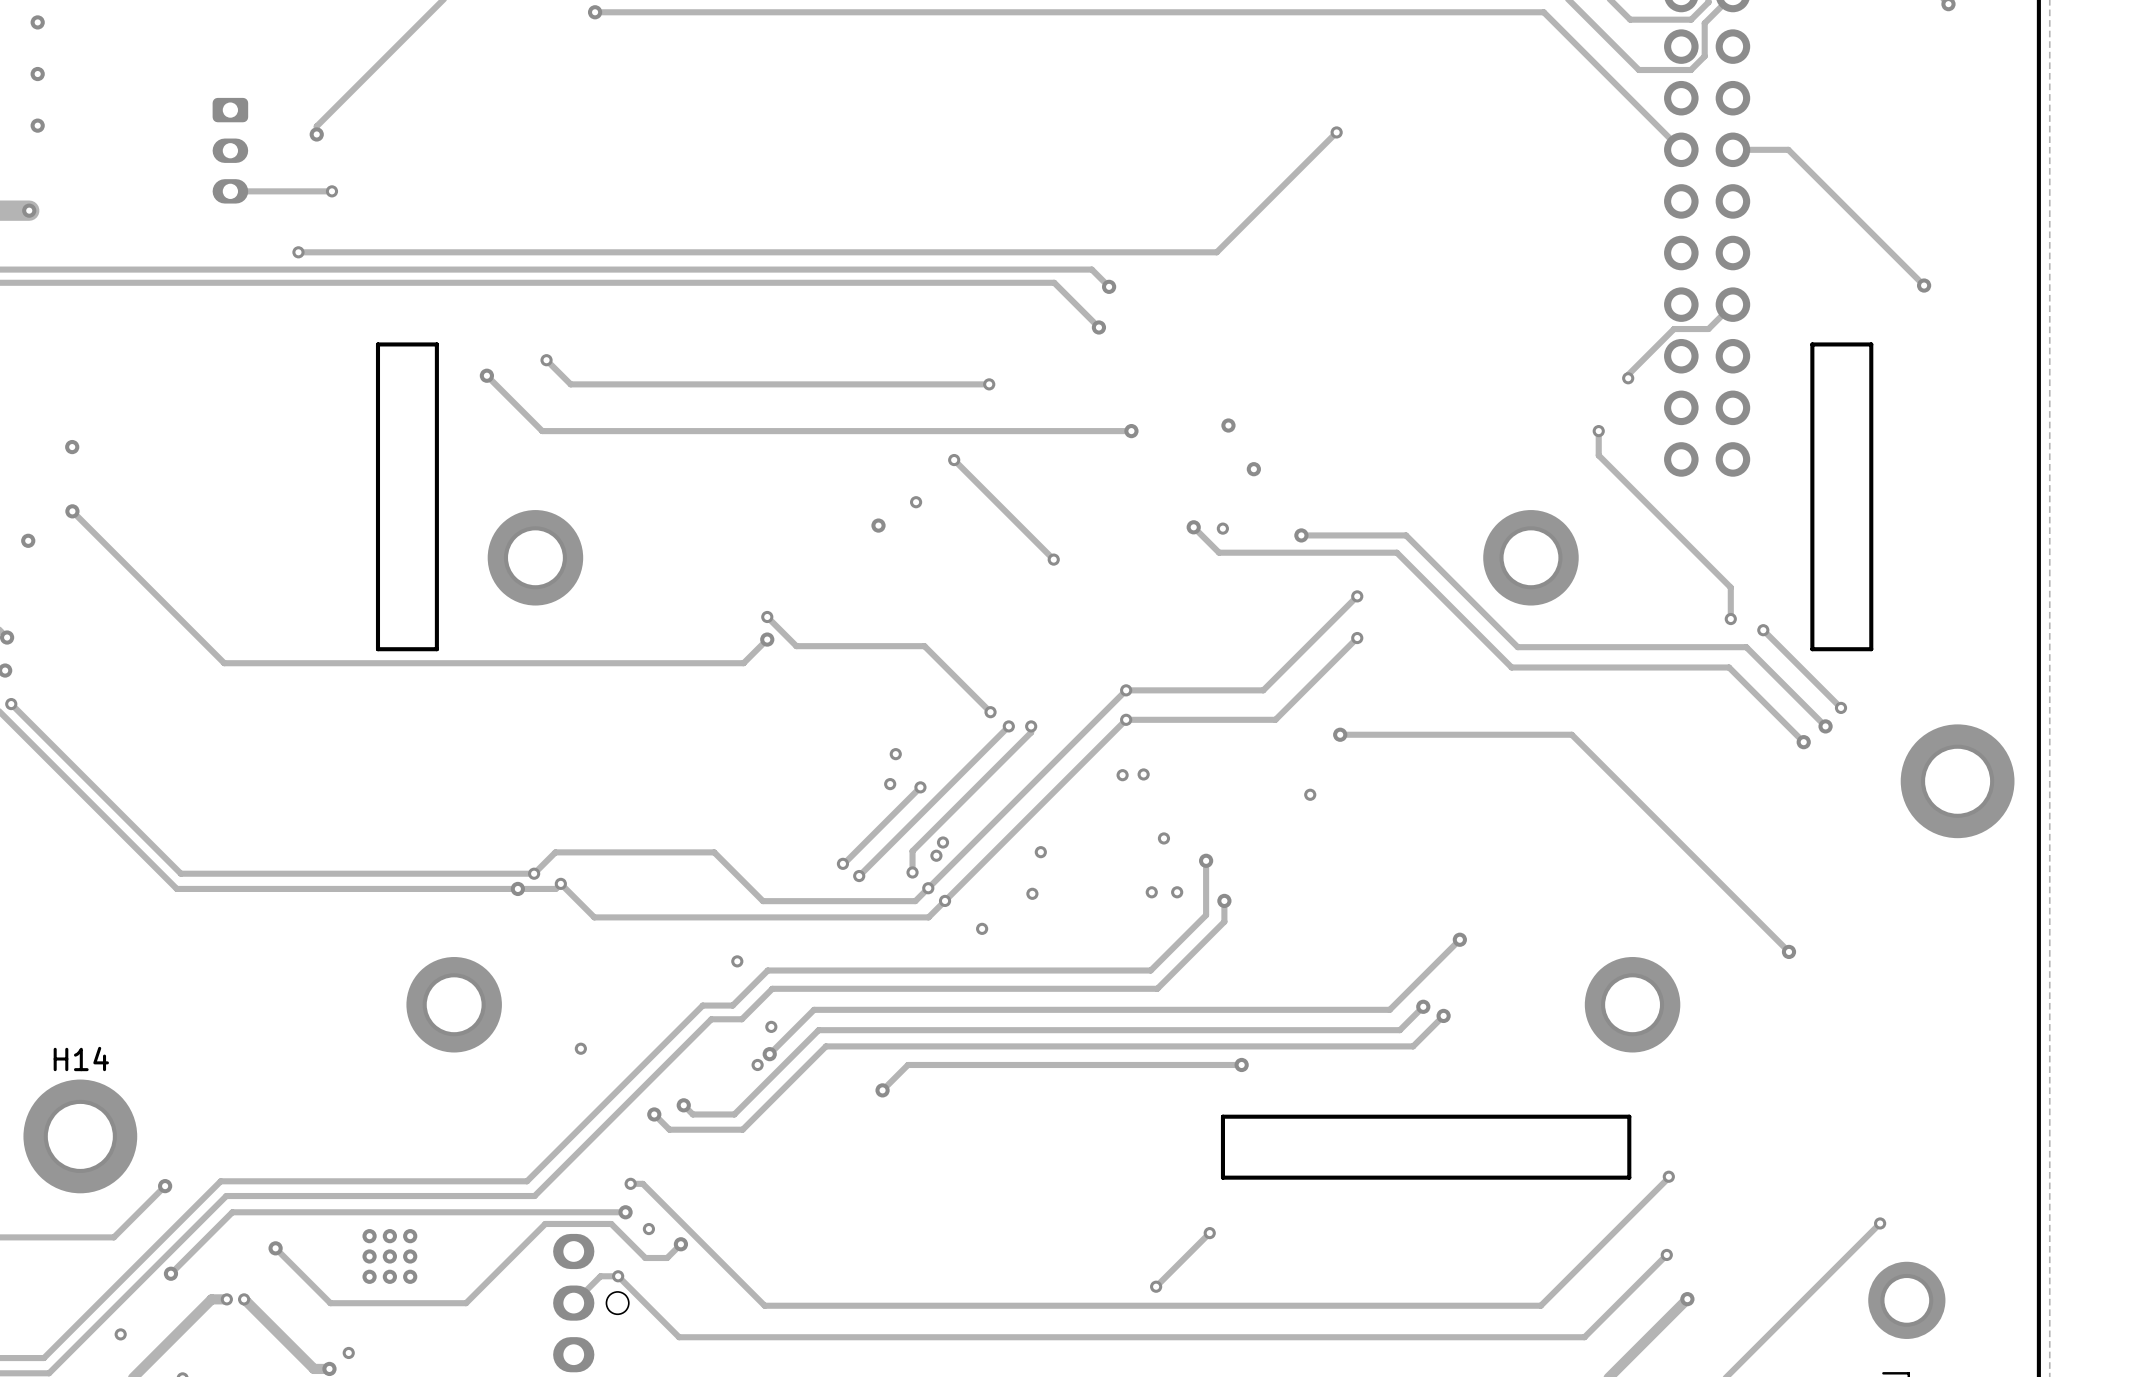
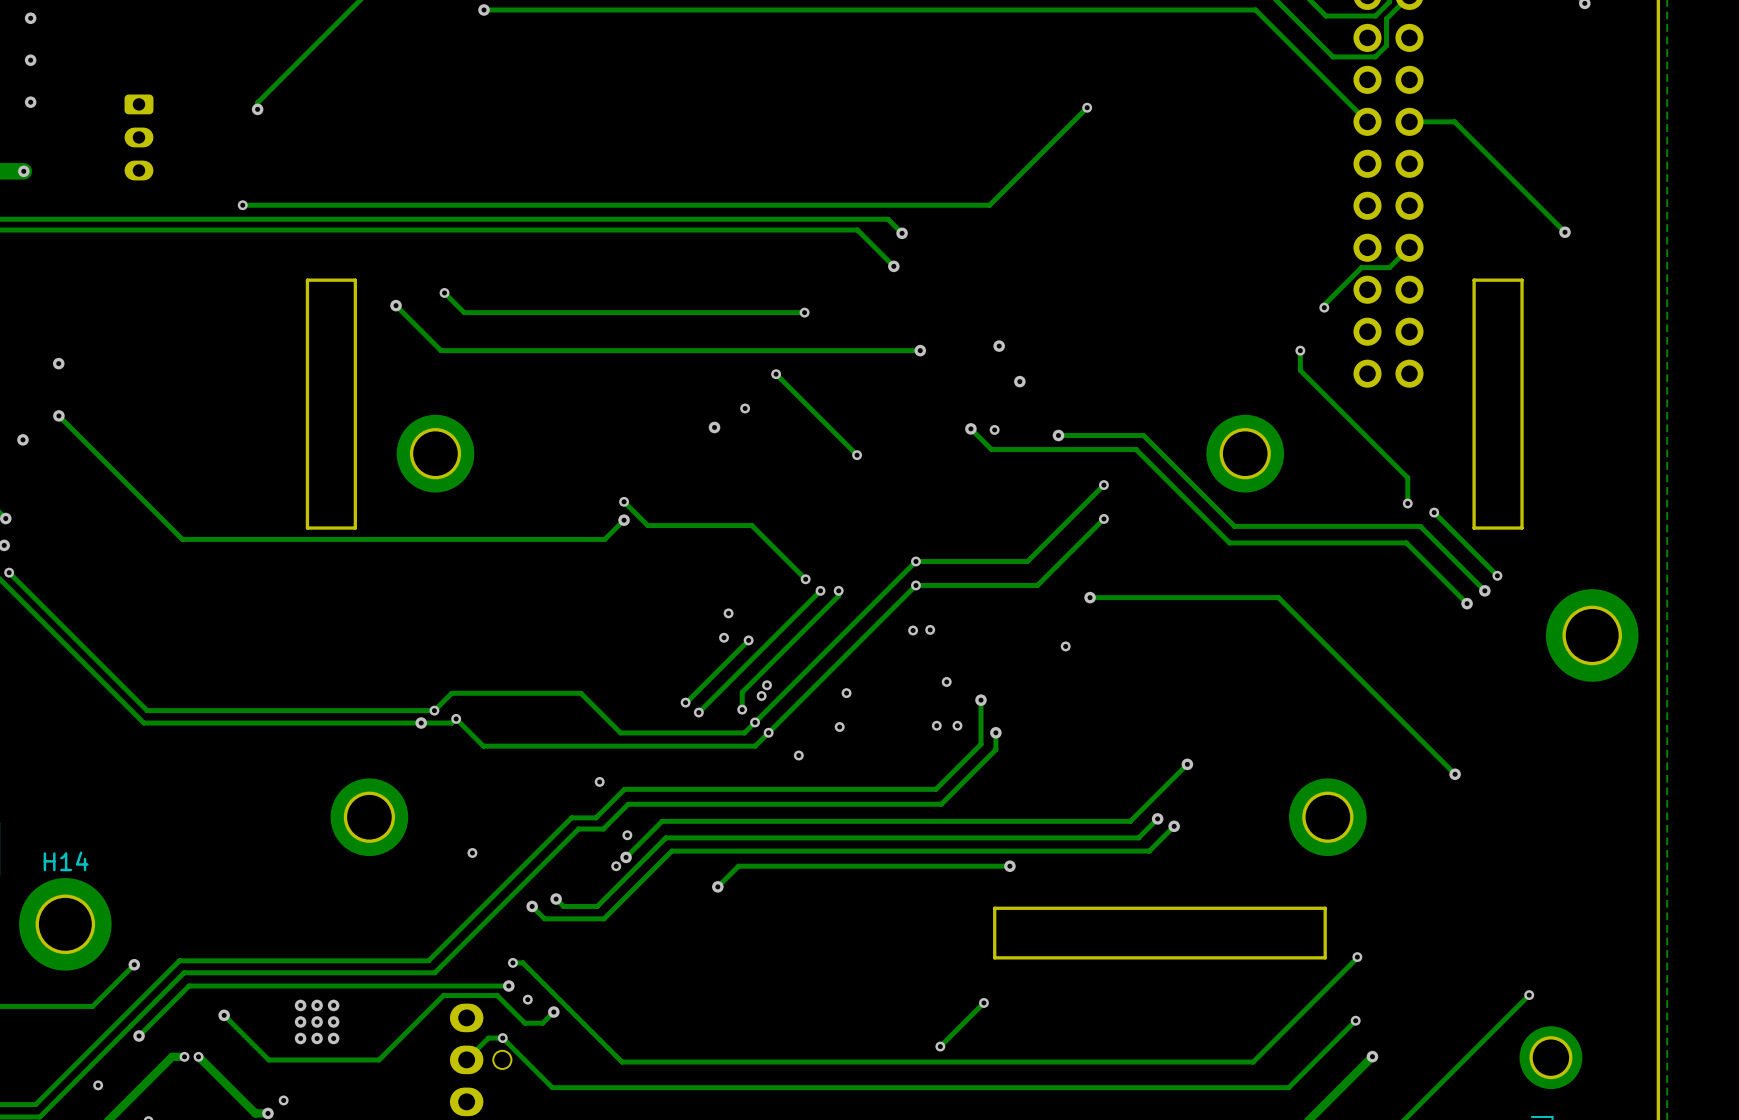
part position: (230, 150) -> (138, 137)
track: (331, 191) (230, 191) -> none
via: (331, 191) -> none

